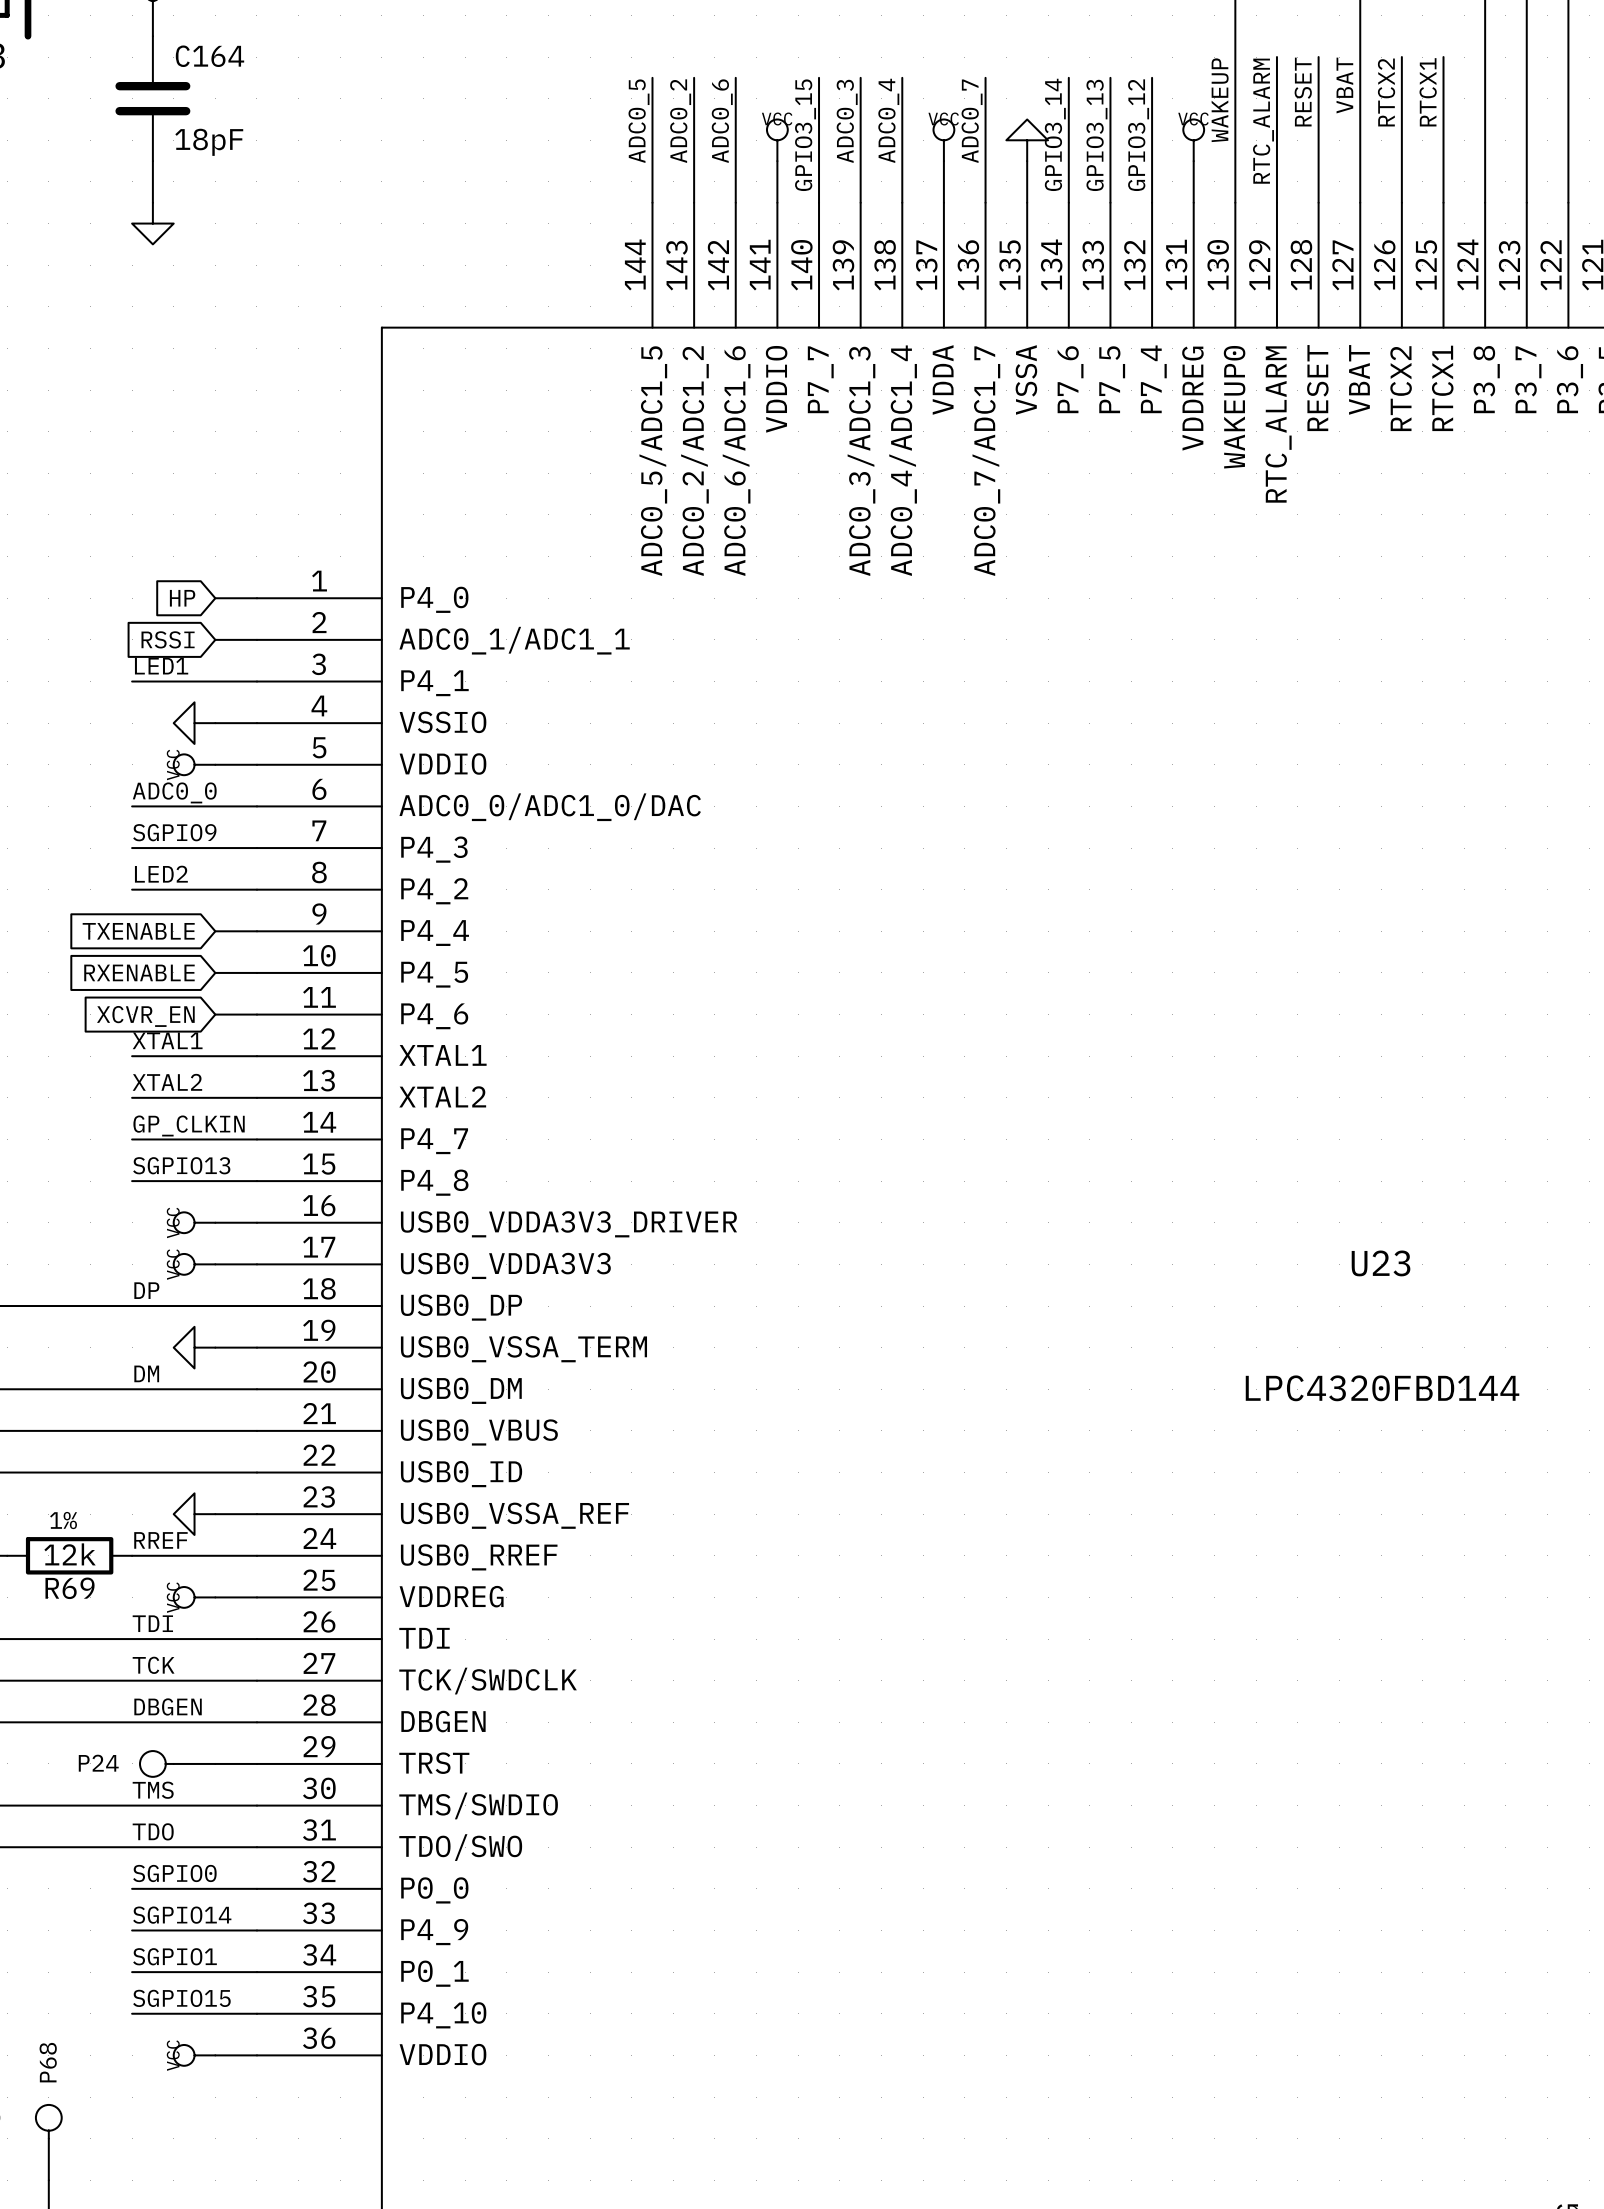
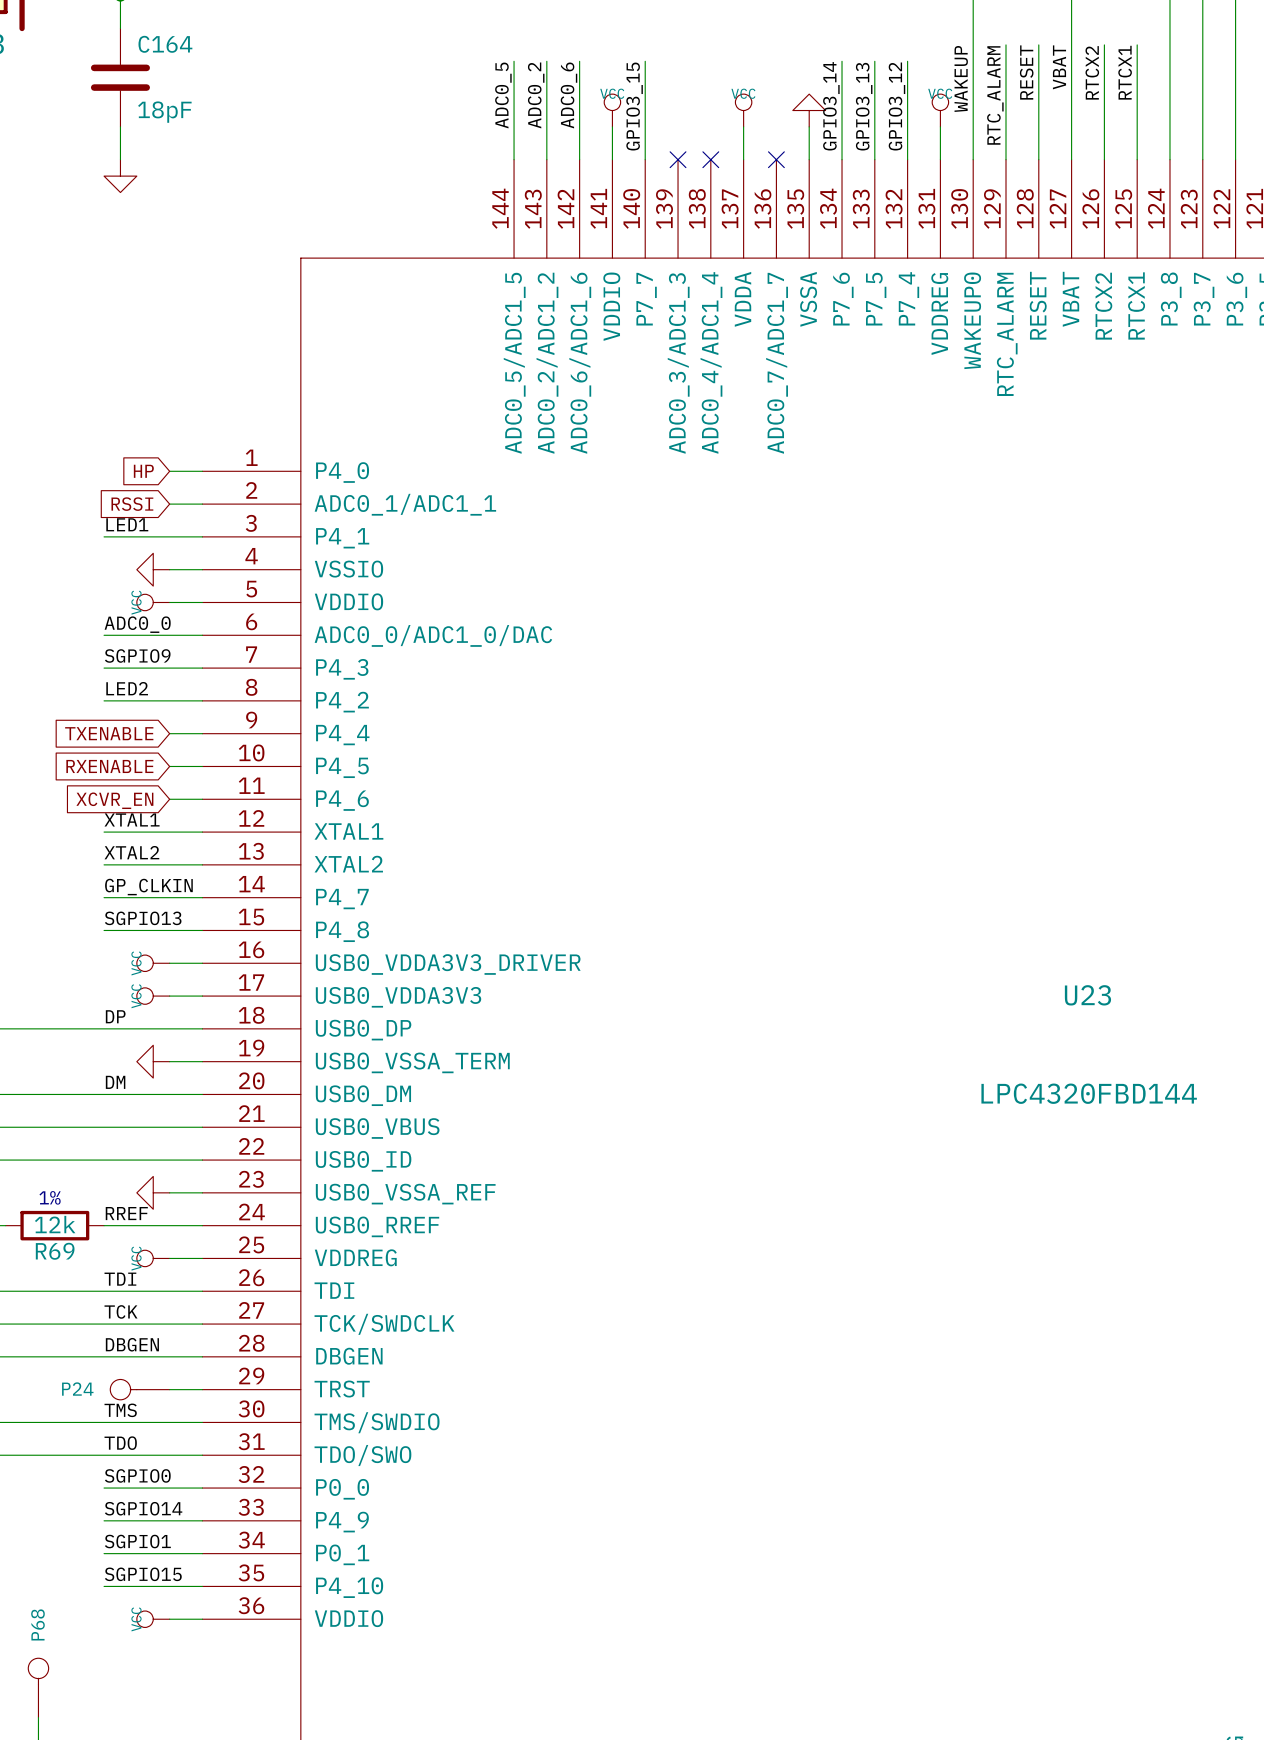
wire: (860, 77) (860, 202) -> none
wire: (902, 77) (902, 202) -> none
wire: (985, 77) (985, 202) -> none
label: ADC0_4 (888, 120) -> none
label: ADC0_3 (847, 121) -> none
label: ADC0_7 (972, 121) -> none
no-connect mark: none -> (678, 159)
no-connect mark: none -> (710, 159)
no-connect mark: none -> (776, 159)

